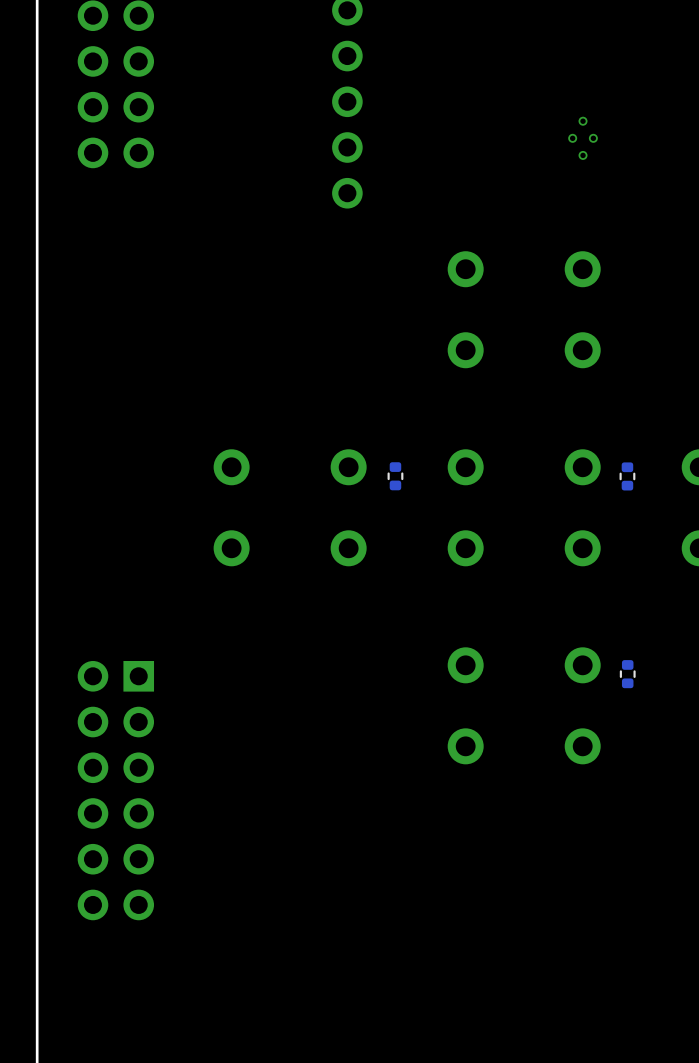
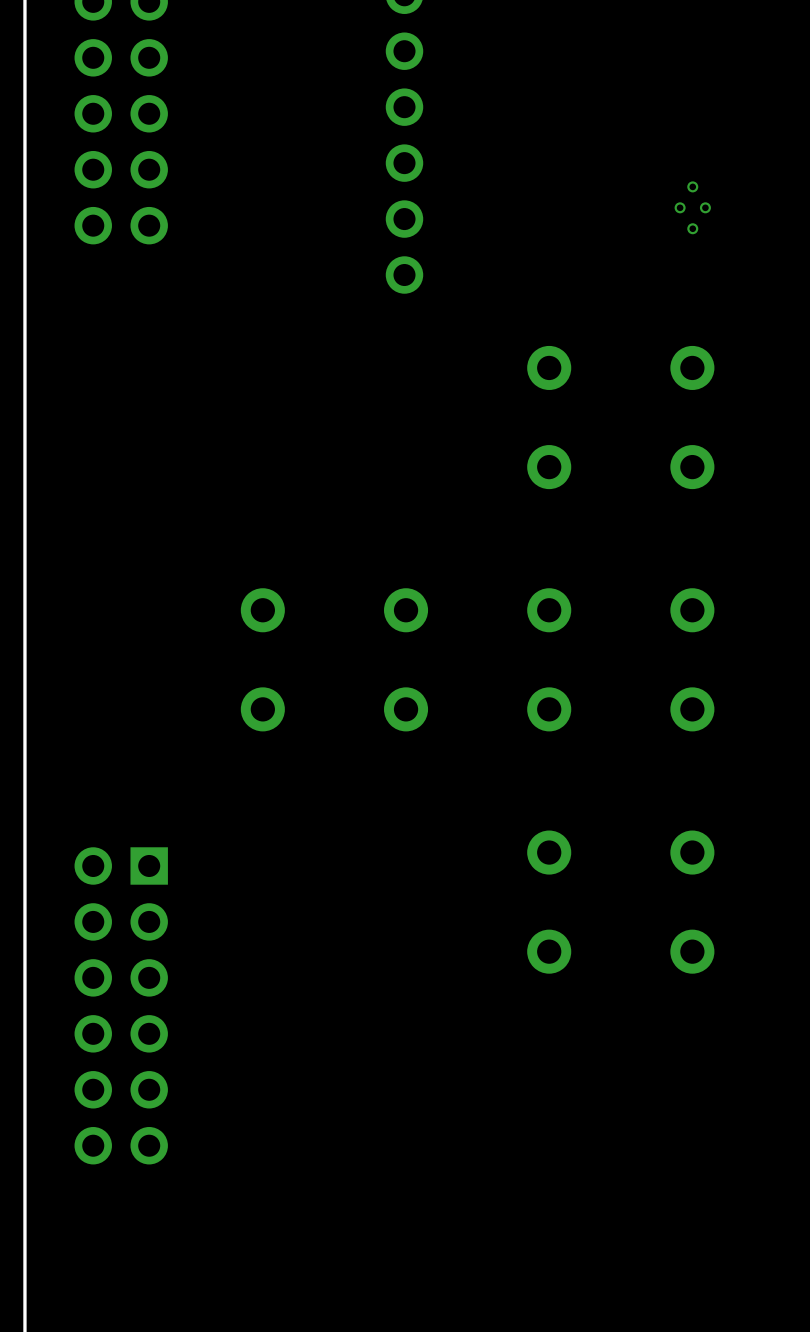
part: (395, 476) -> none
part: (627, 476) -> none
part: (627, 674) -> none

